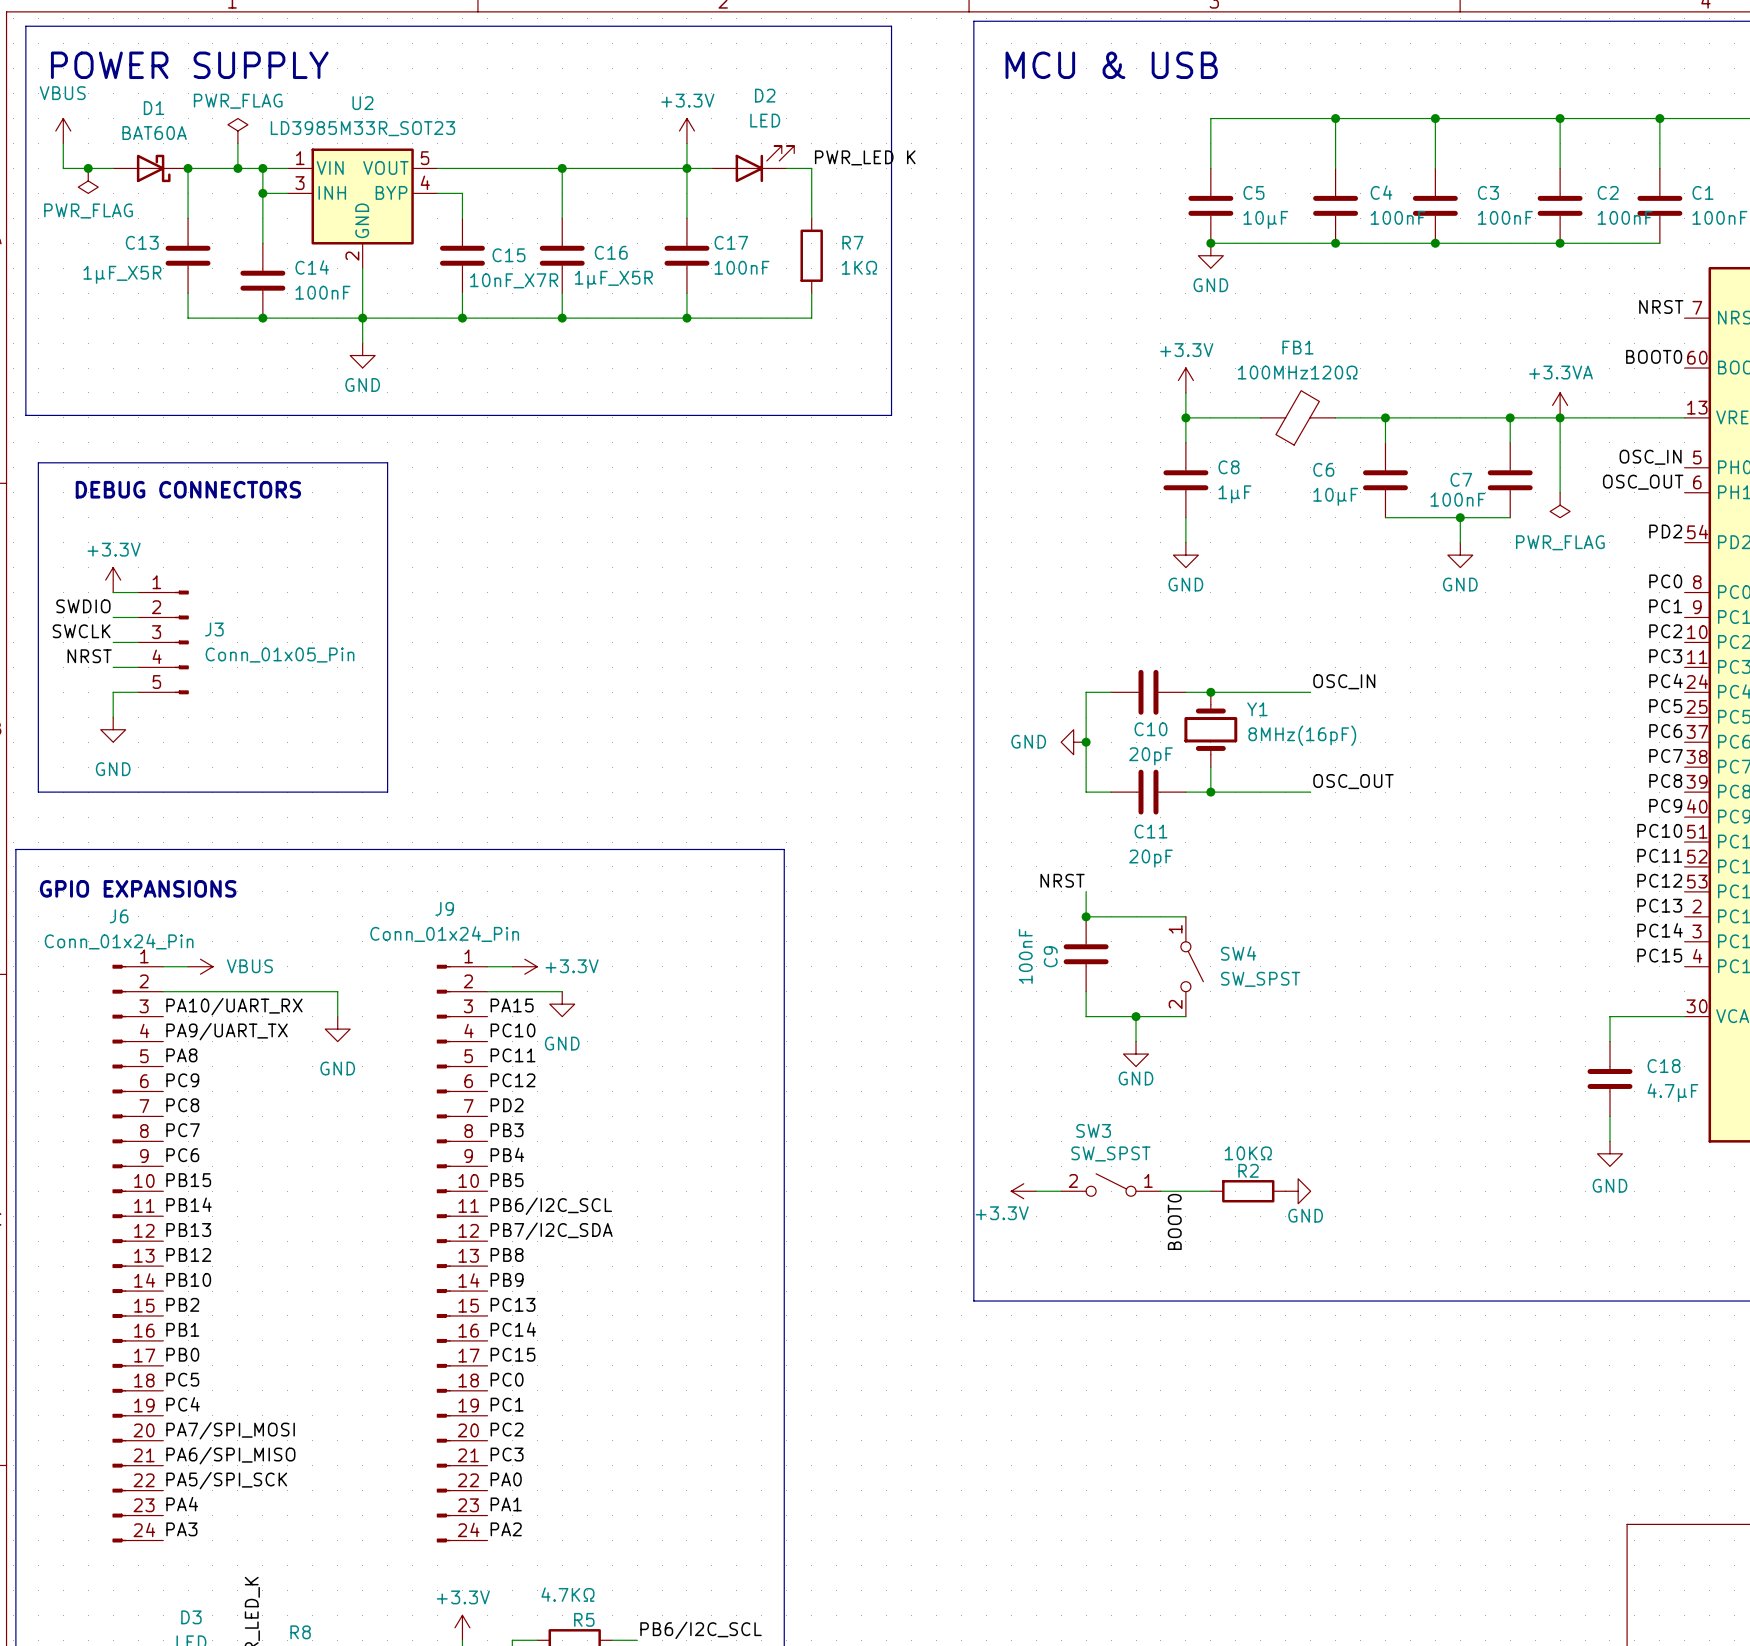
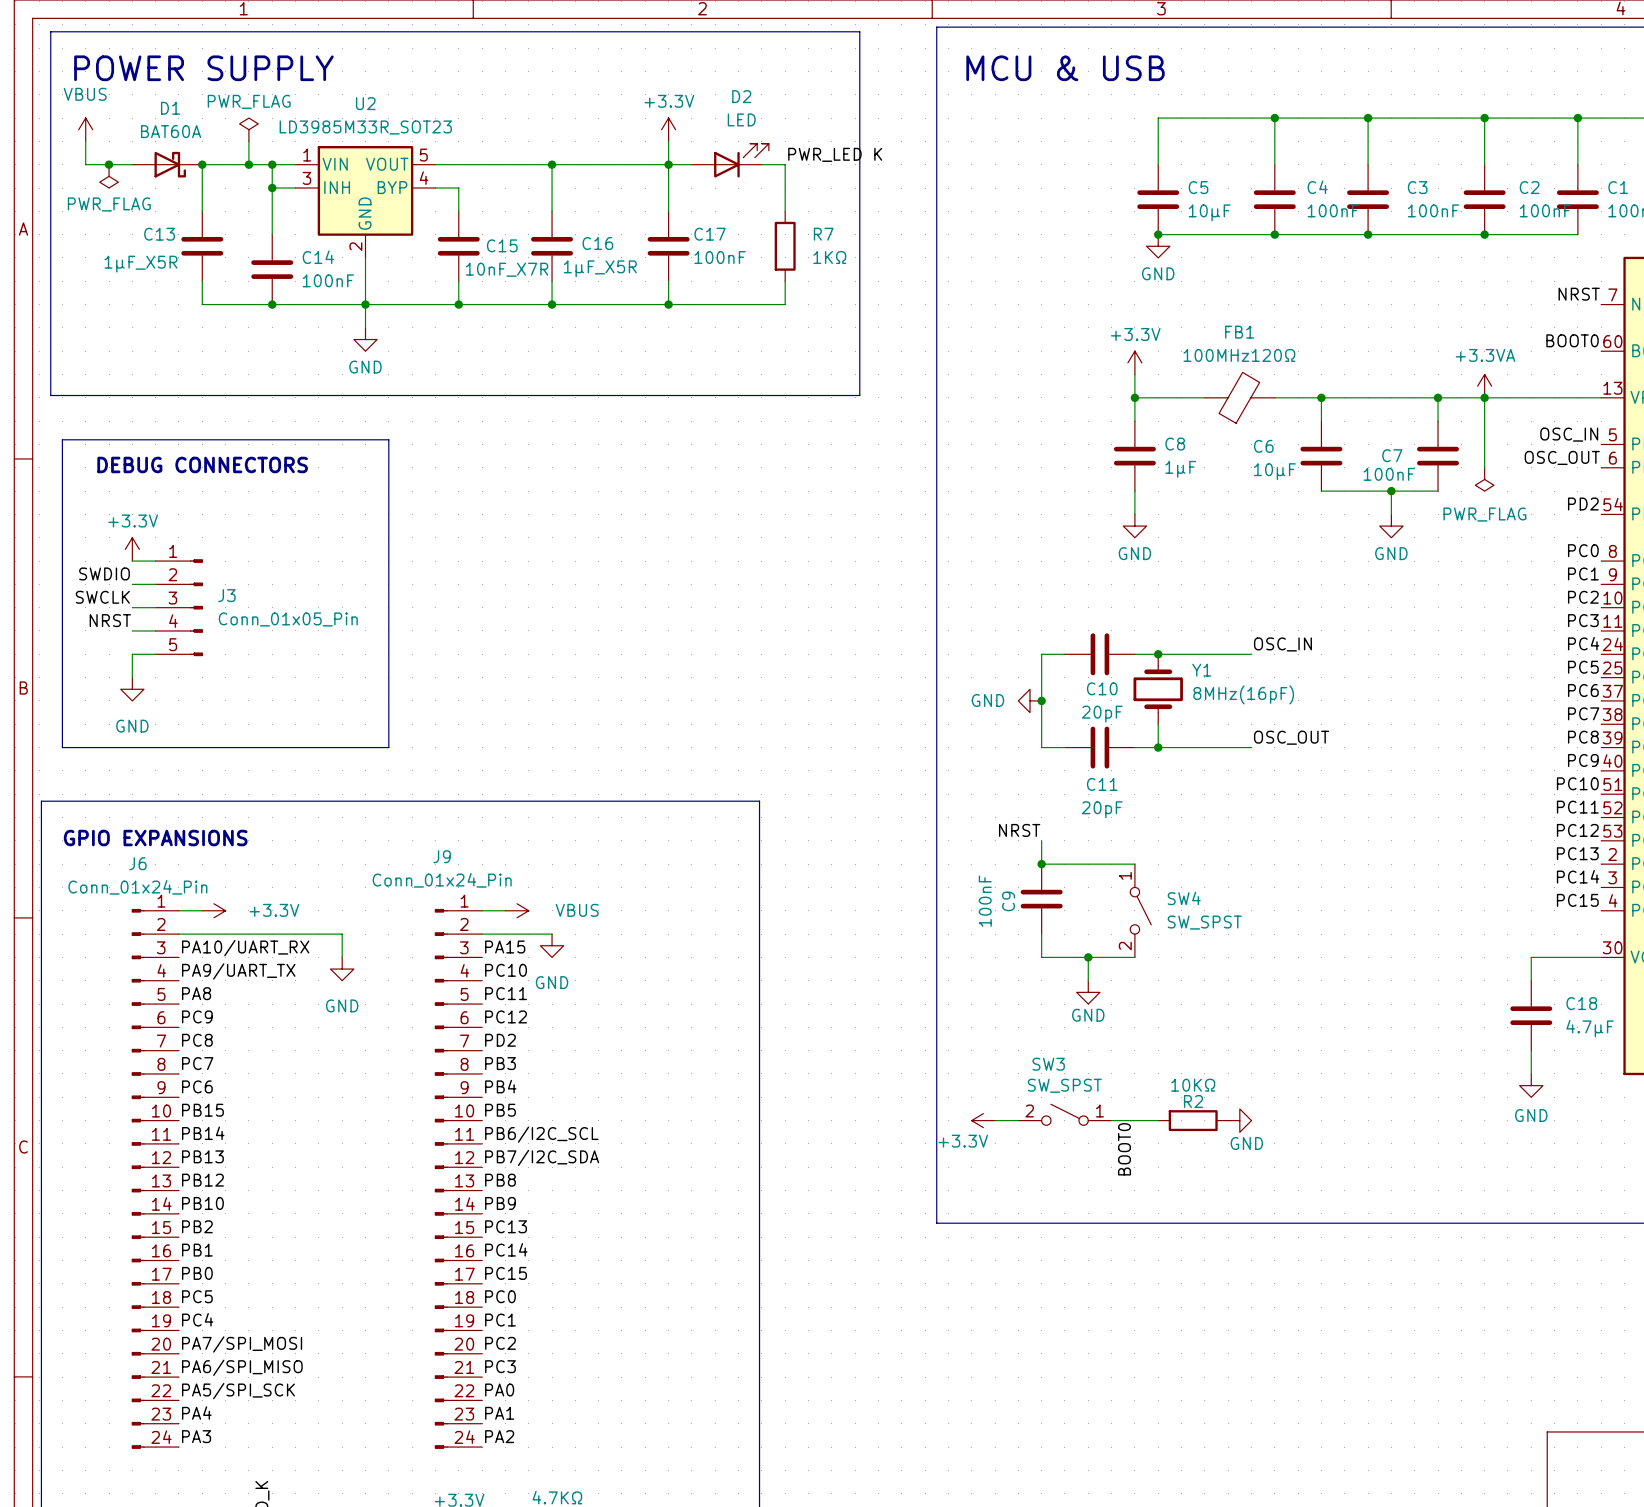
power symbol: VBUS (200, 966) -> +3.3V (213, 910)
power symbol: +3.3V (524, 966) -> VBUS (517, 910)

